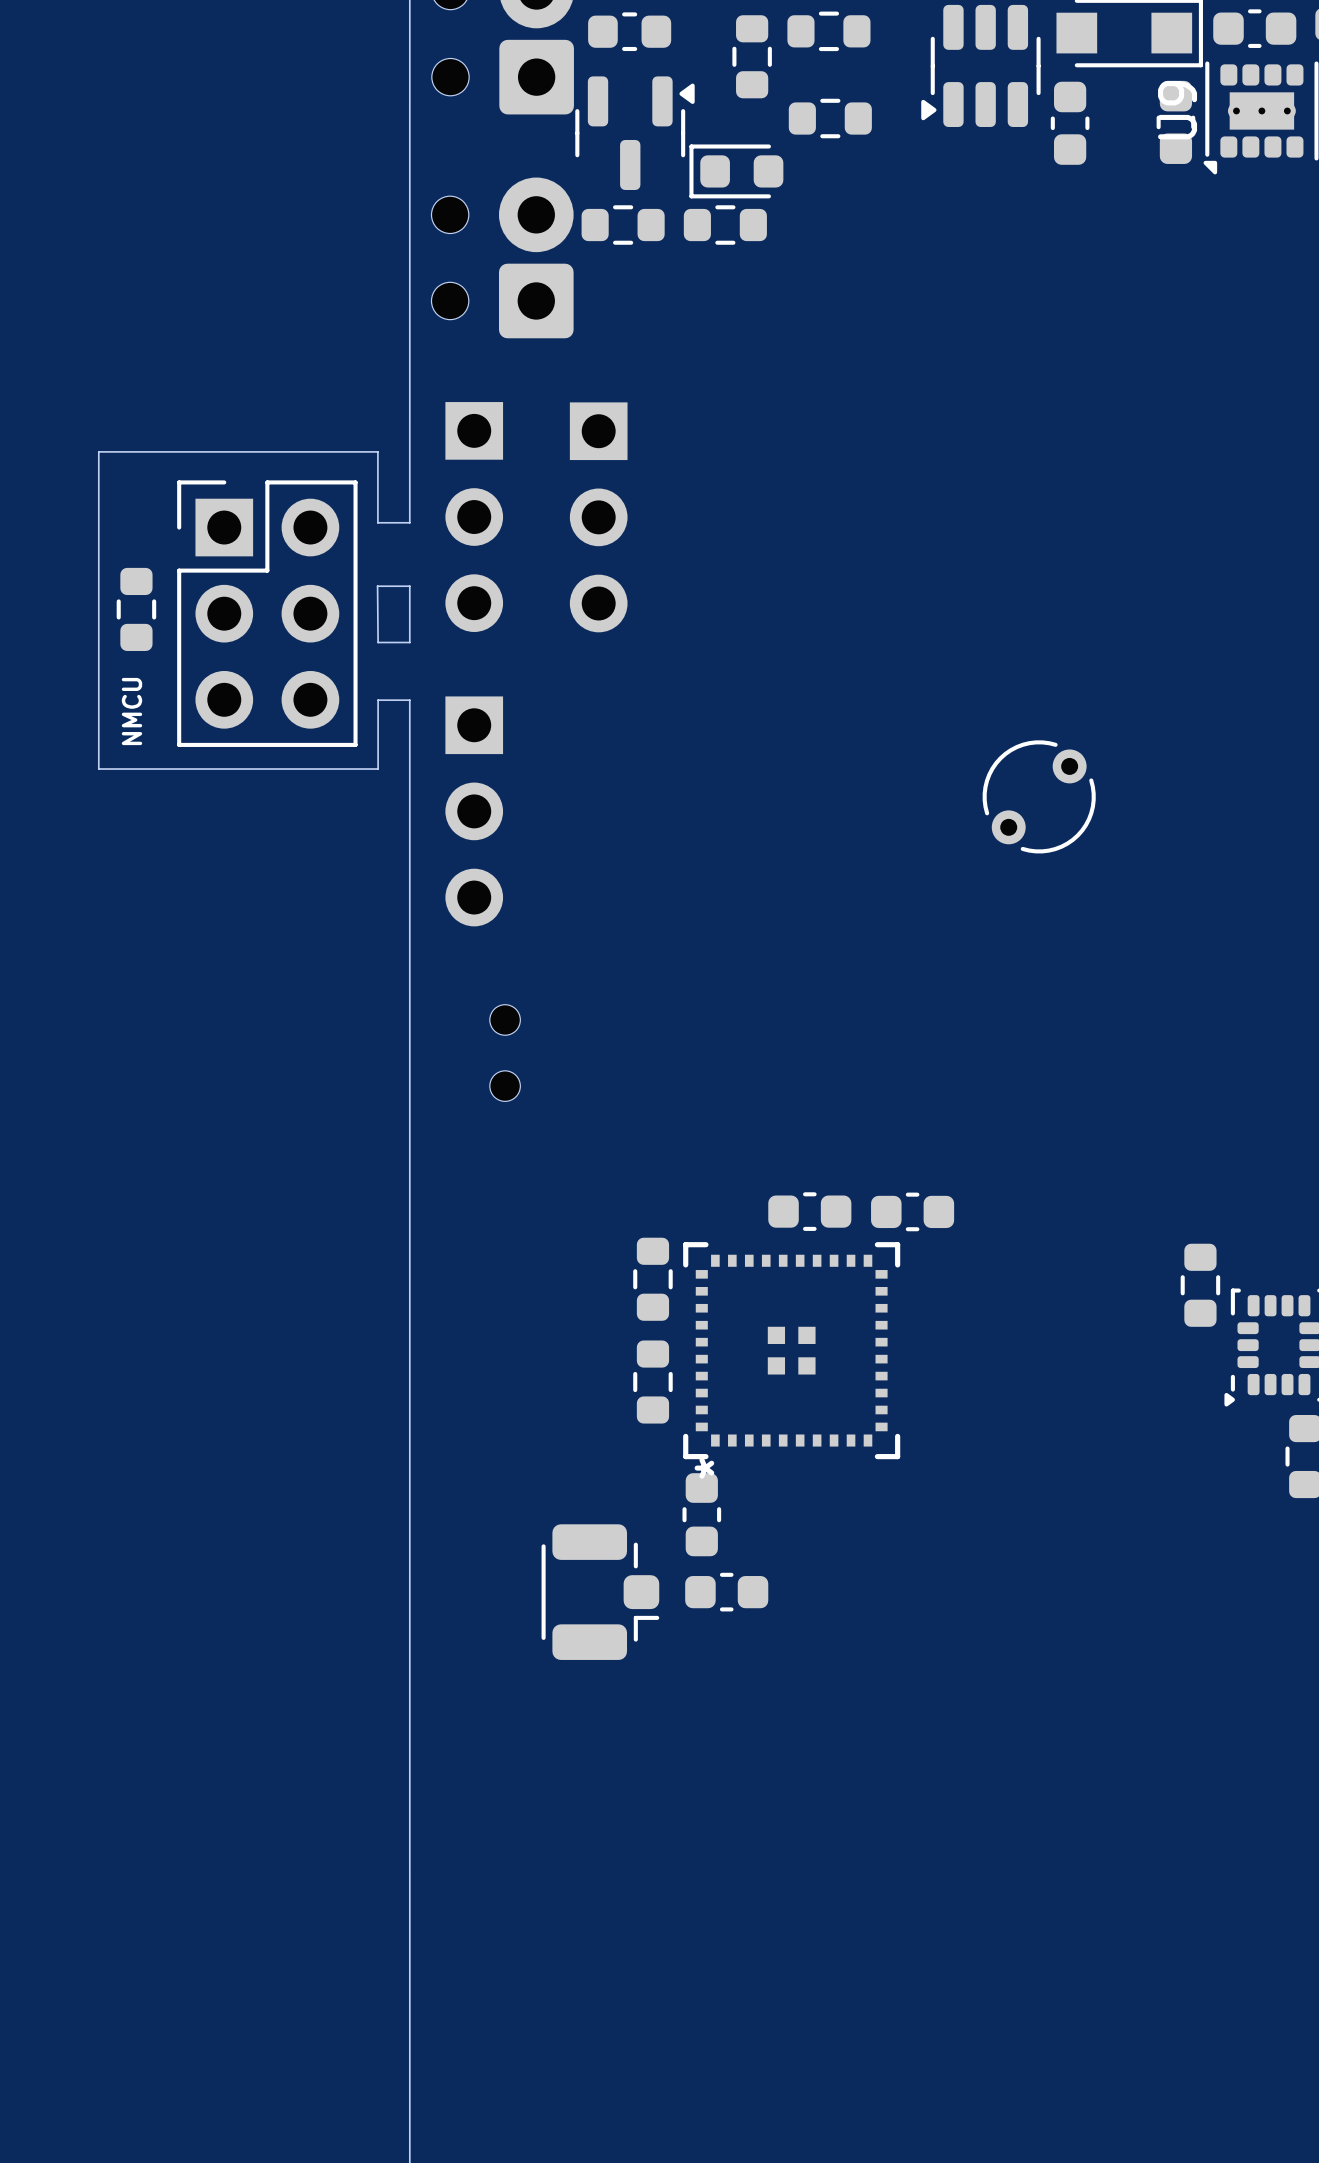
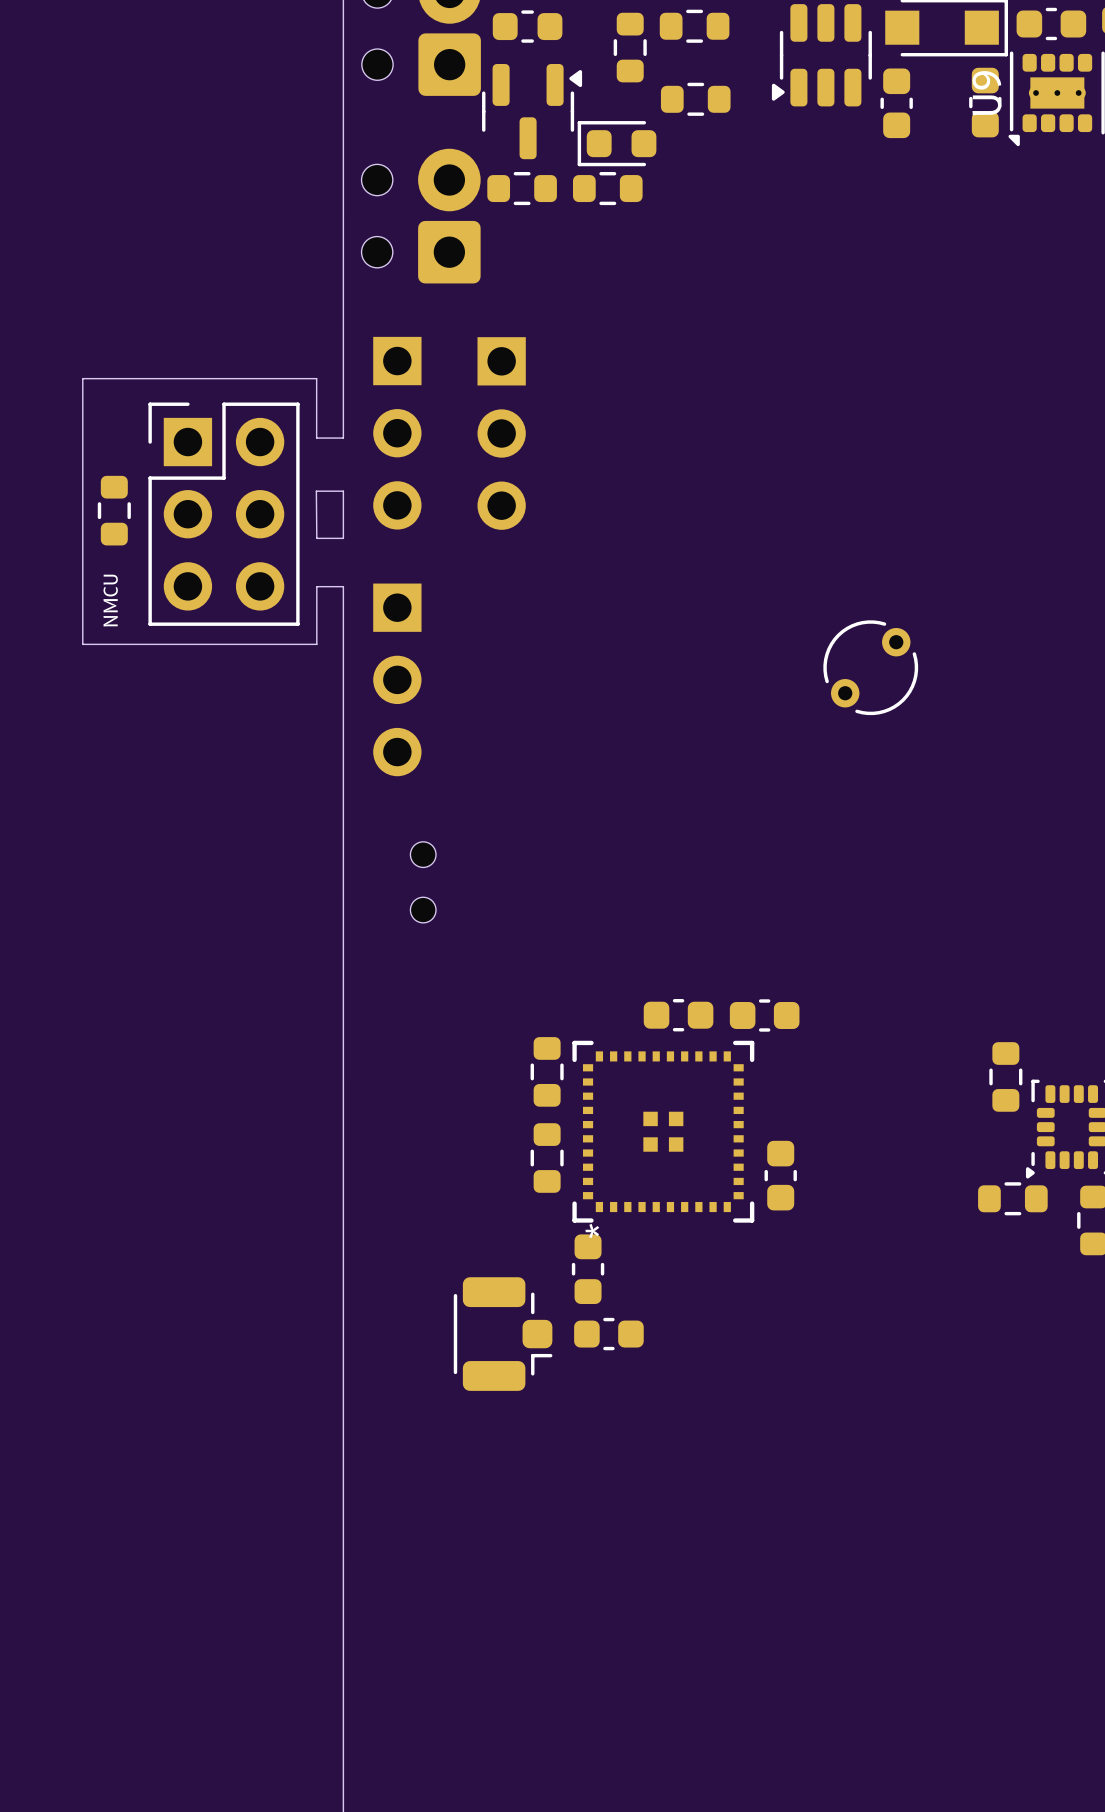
part: none -> (780, 1175)
part: none -> (1012, 1198)

